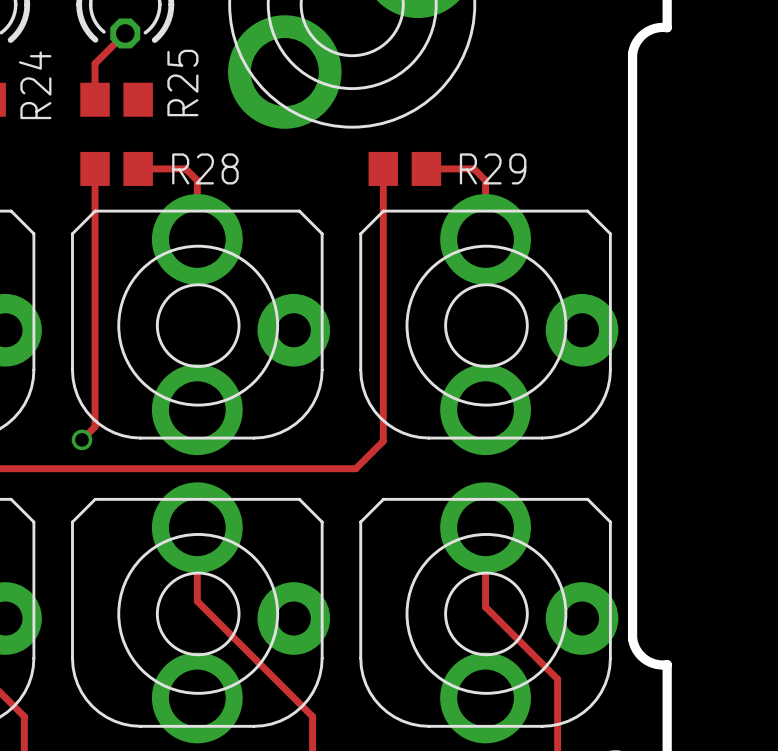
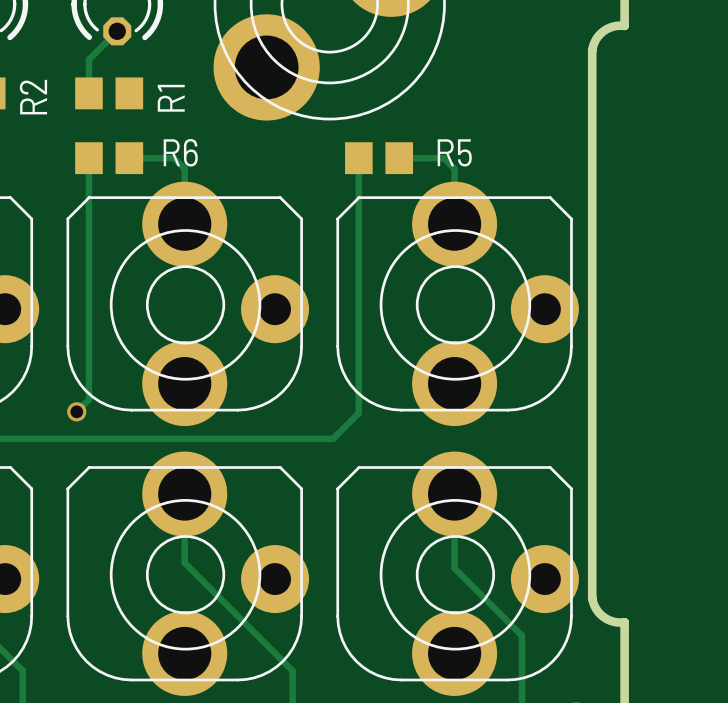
R25 name: R25 (182, 82) -> R1 (171, 98)
R24 name: R24 (35, 85) -> R2 (33, 97)
R28 name: R28 (205, 168) -> R6 (180, 152)
R29 name: R29 (493, 168) -> R5 (454, 152)

